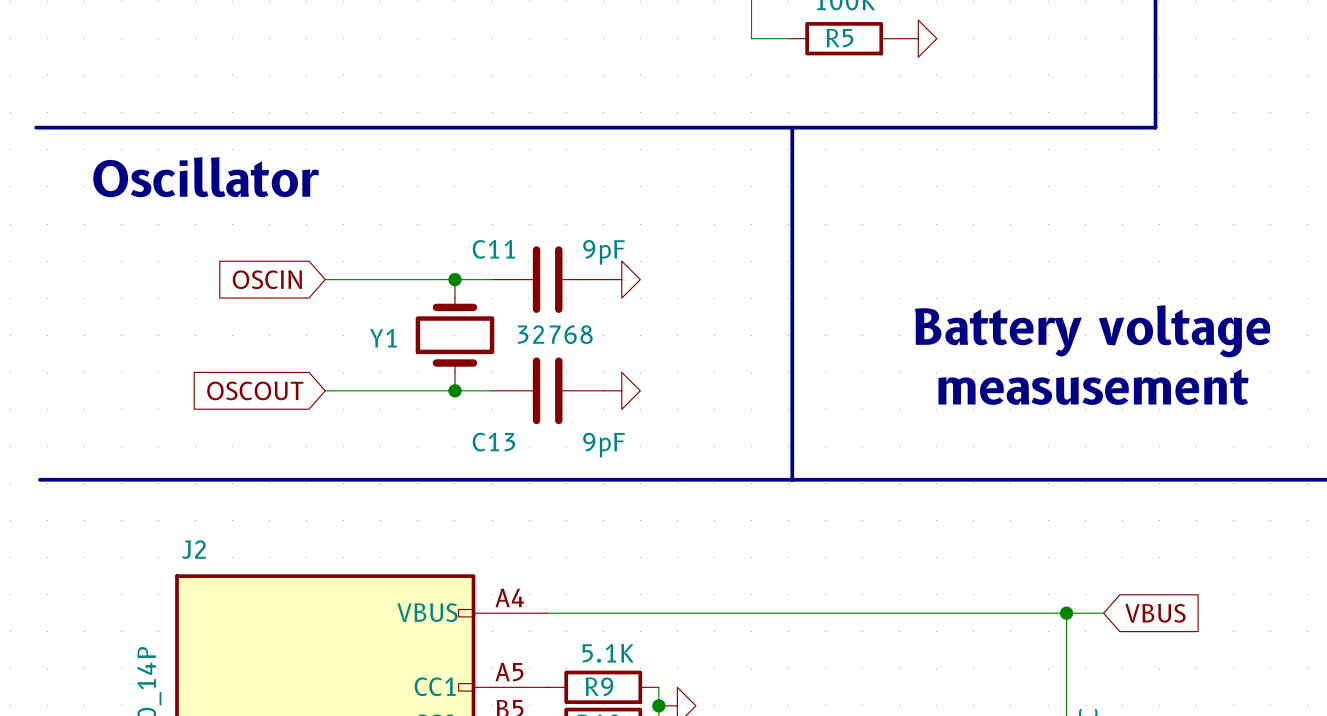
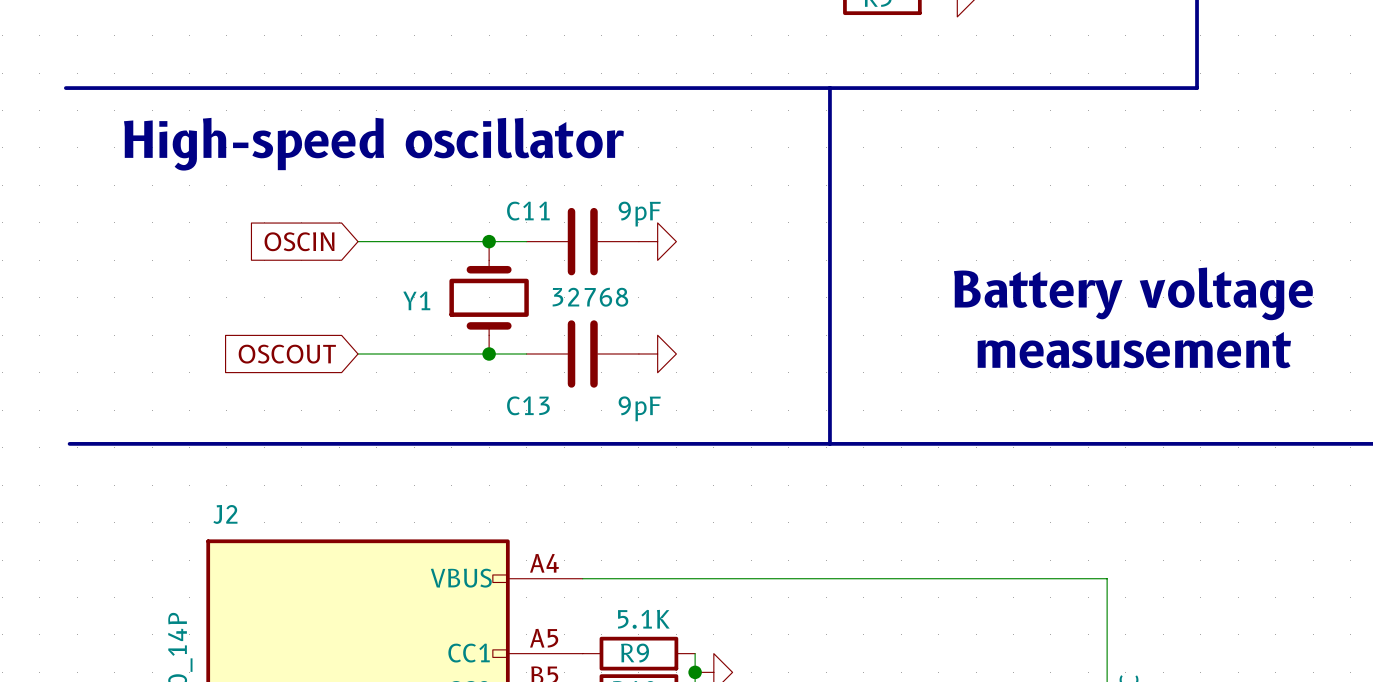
text: Oscillator (206, 177) -> High-speed oscillator (373, 144)
wire: (1066, 613) (1103, 613) -> none
junction: (1066, 613) -> none
global label: VBUS (1155, 613) -> none

